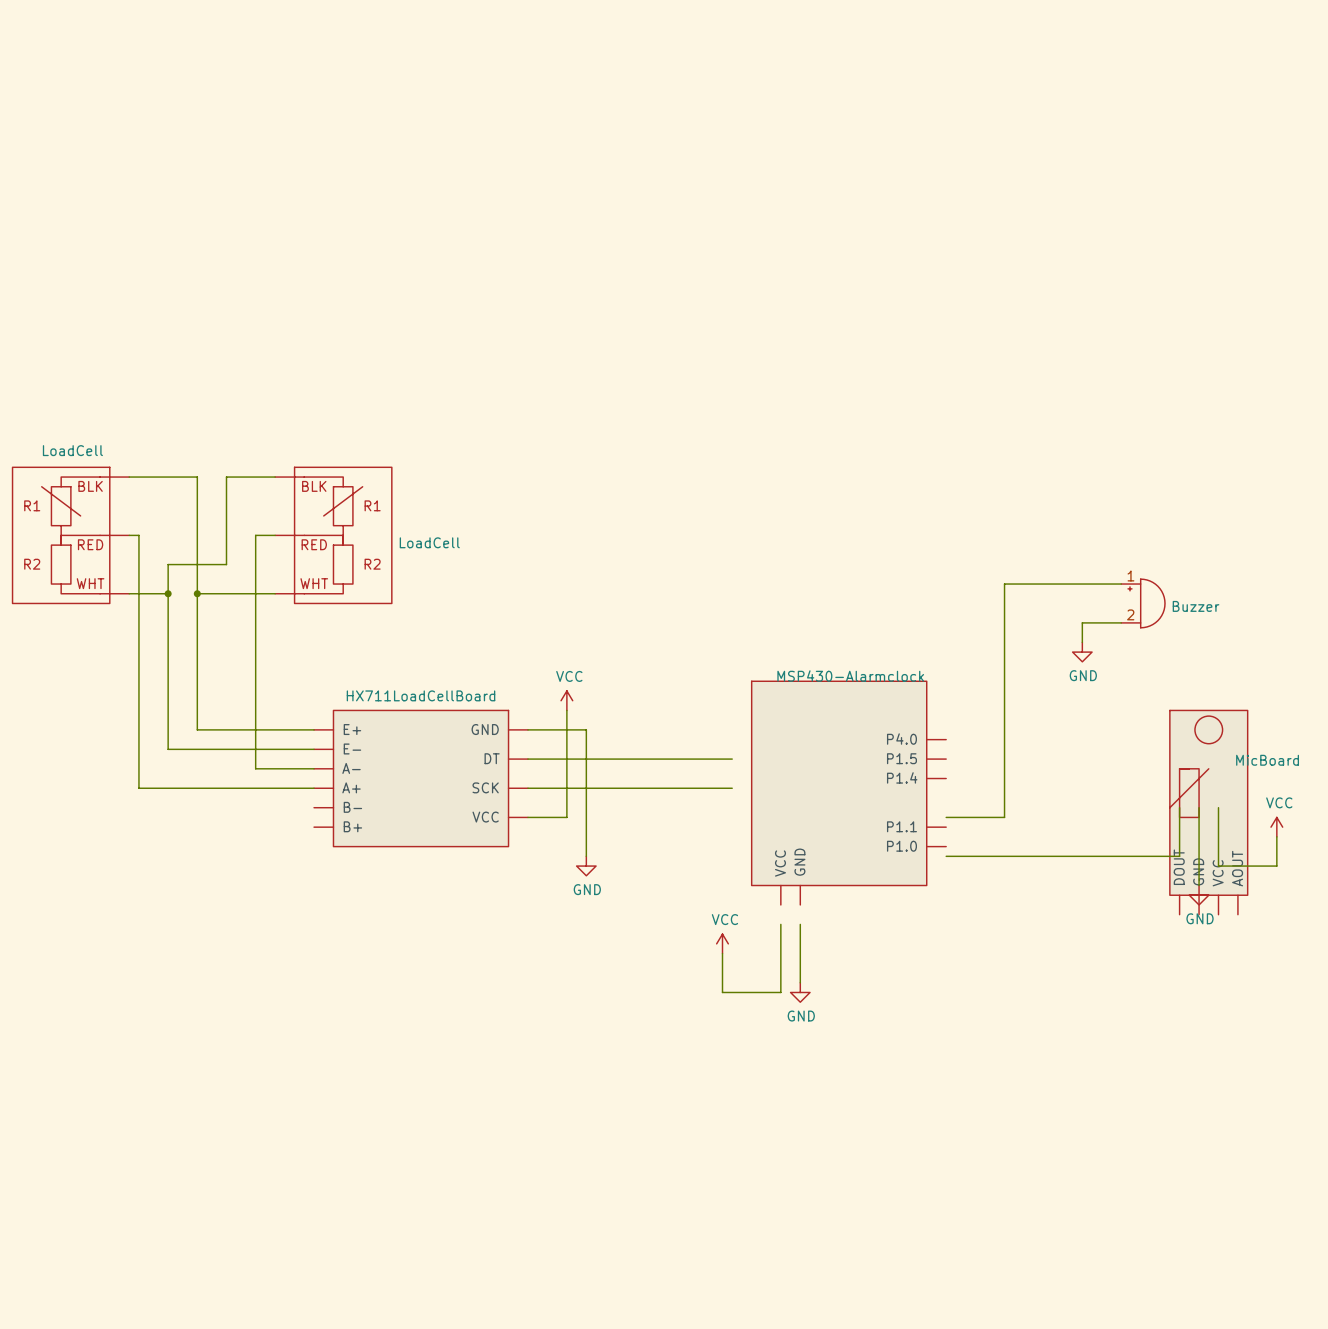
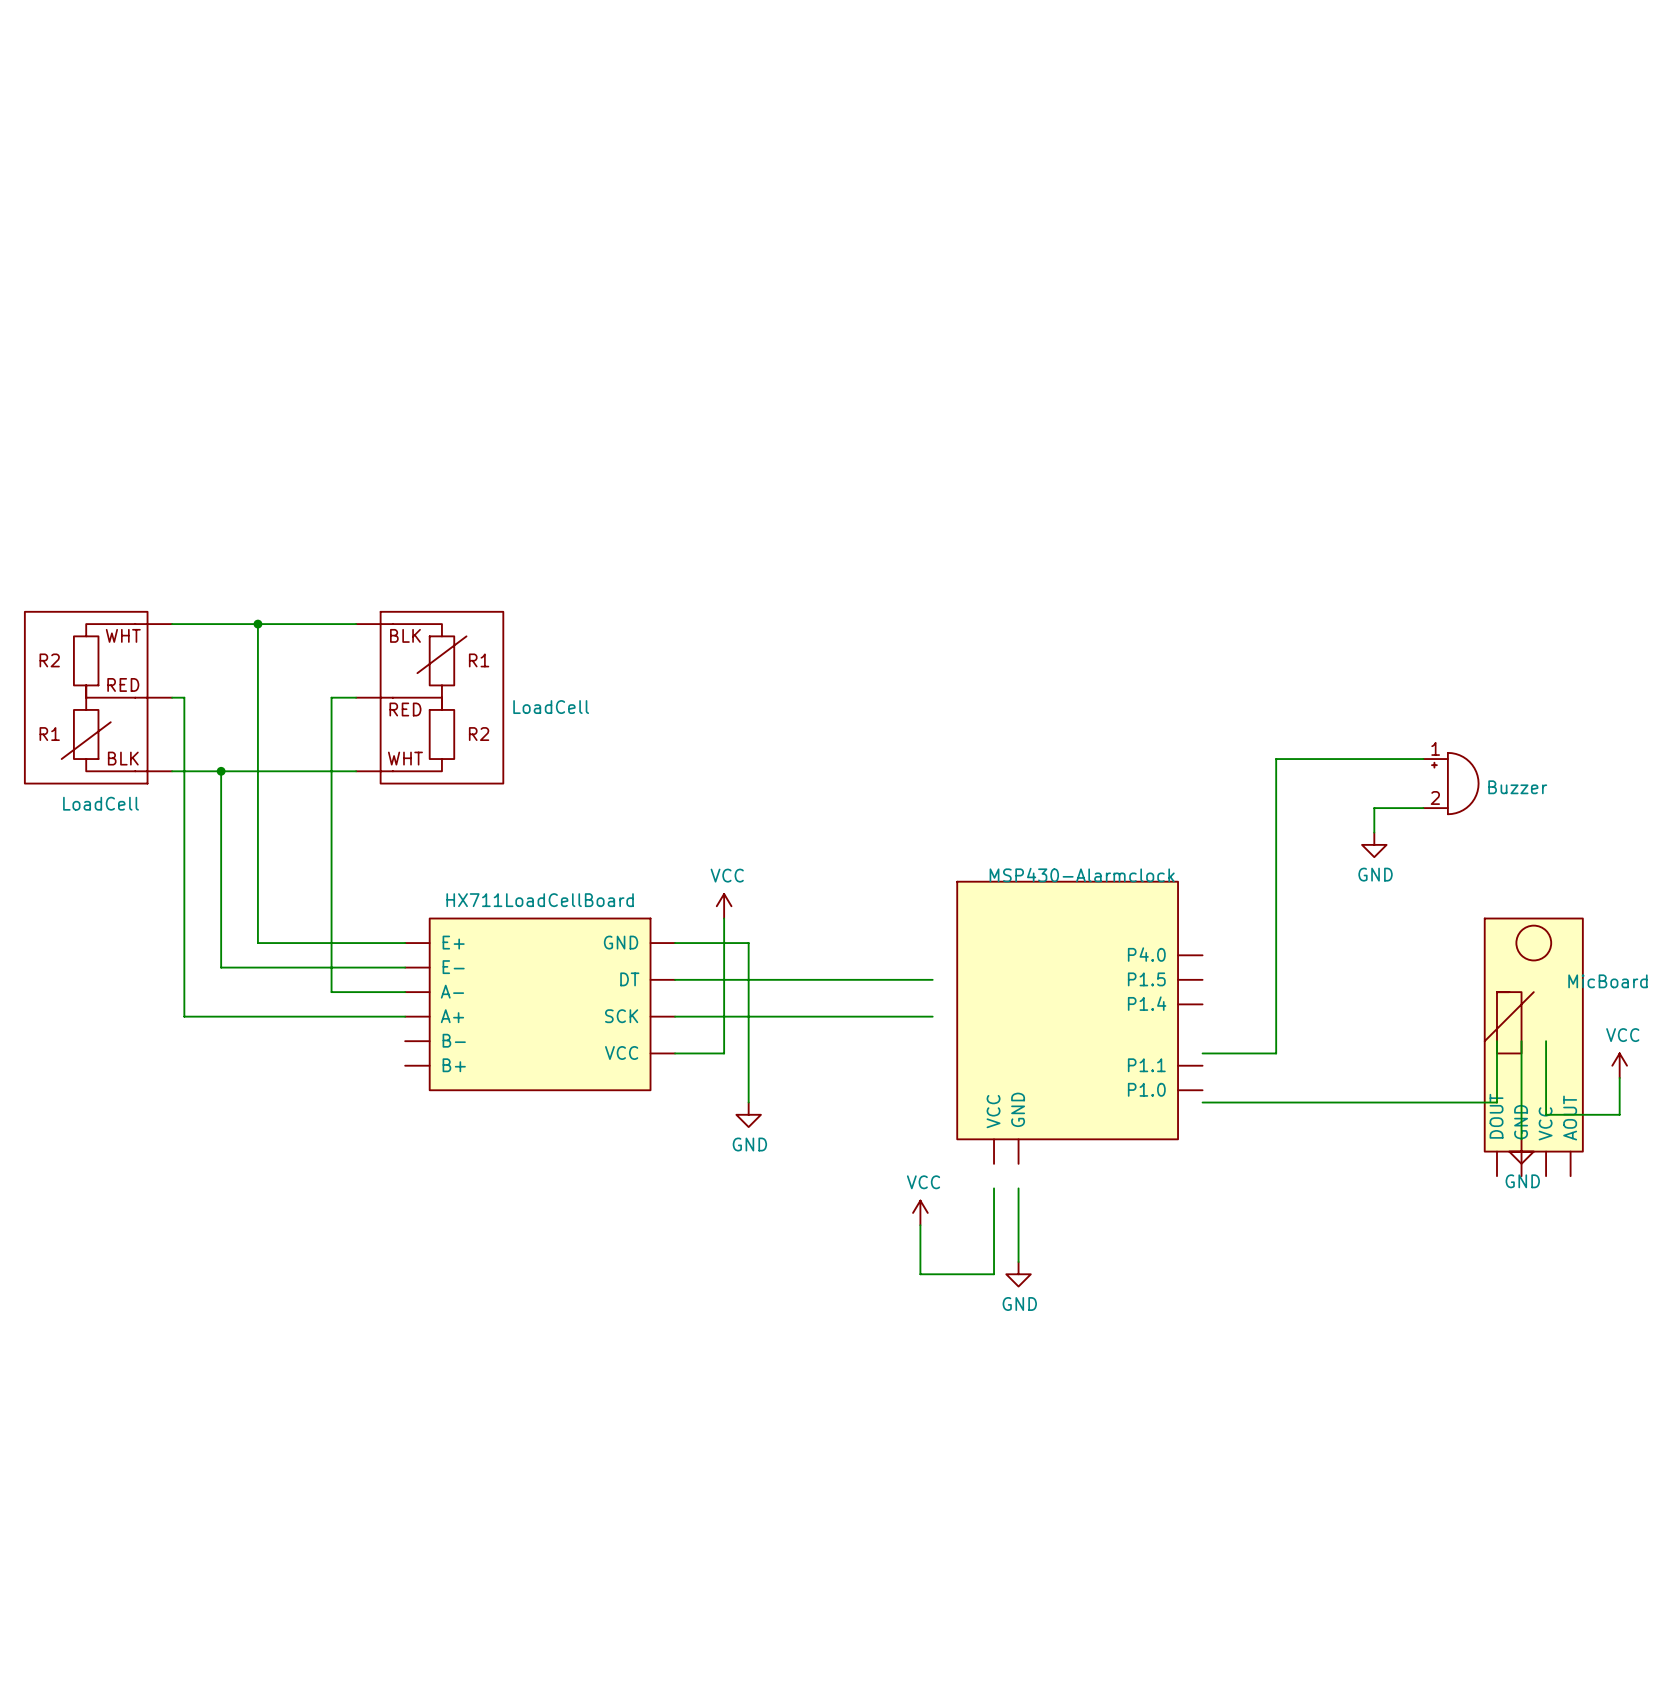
junction: none -> (257, 624)
wire: (226, 477) (226, 564) (168, 564) (168, 593) -> (294, 624) (257, 624)
part flip: as is (61, 535) -> up-down (86, 697)
wire: none -> (221, 771) (257, 771)
junction: (197, 593) -> none

